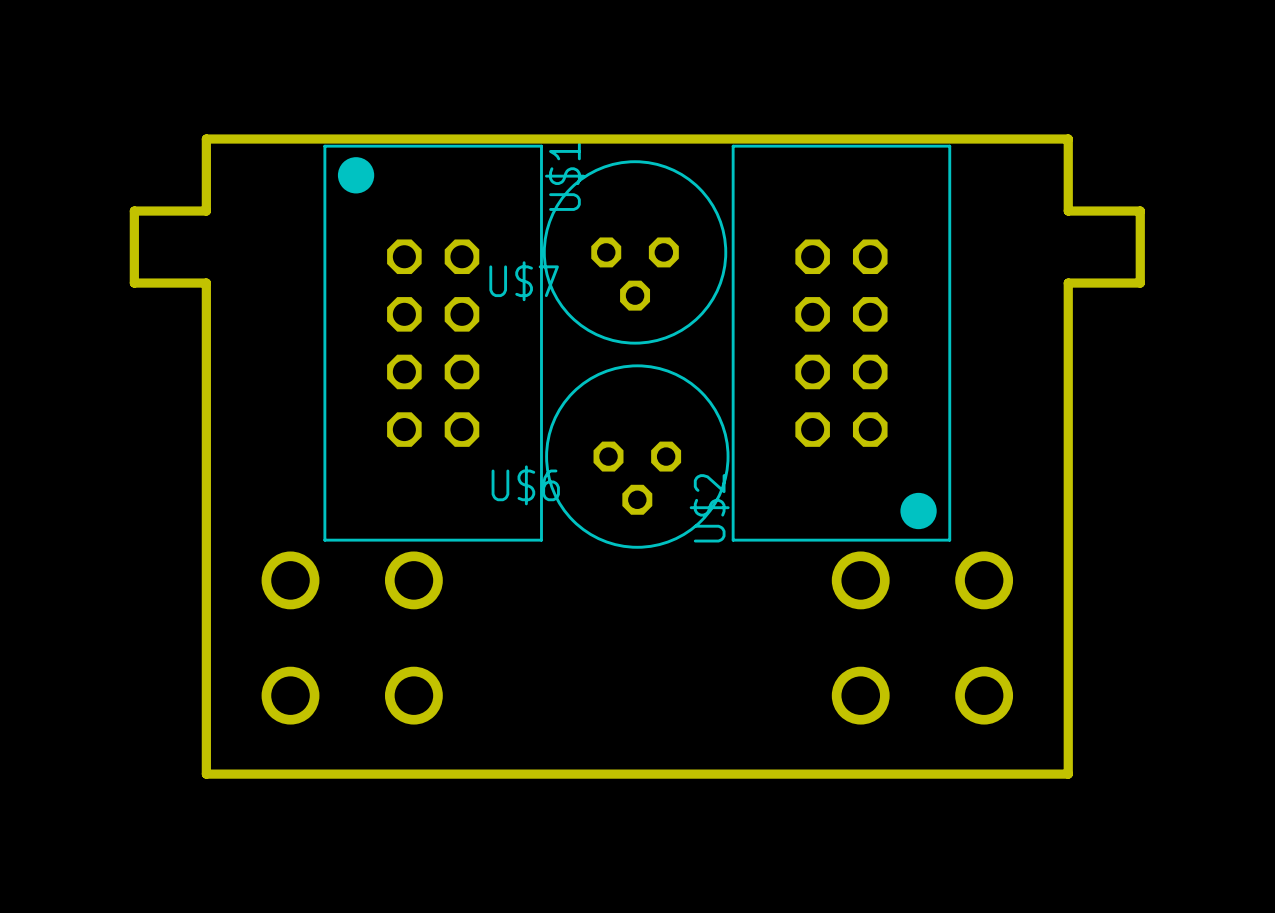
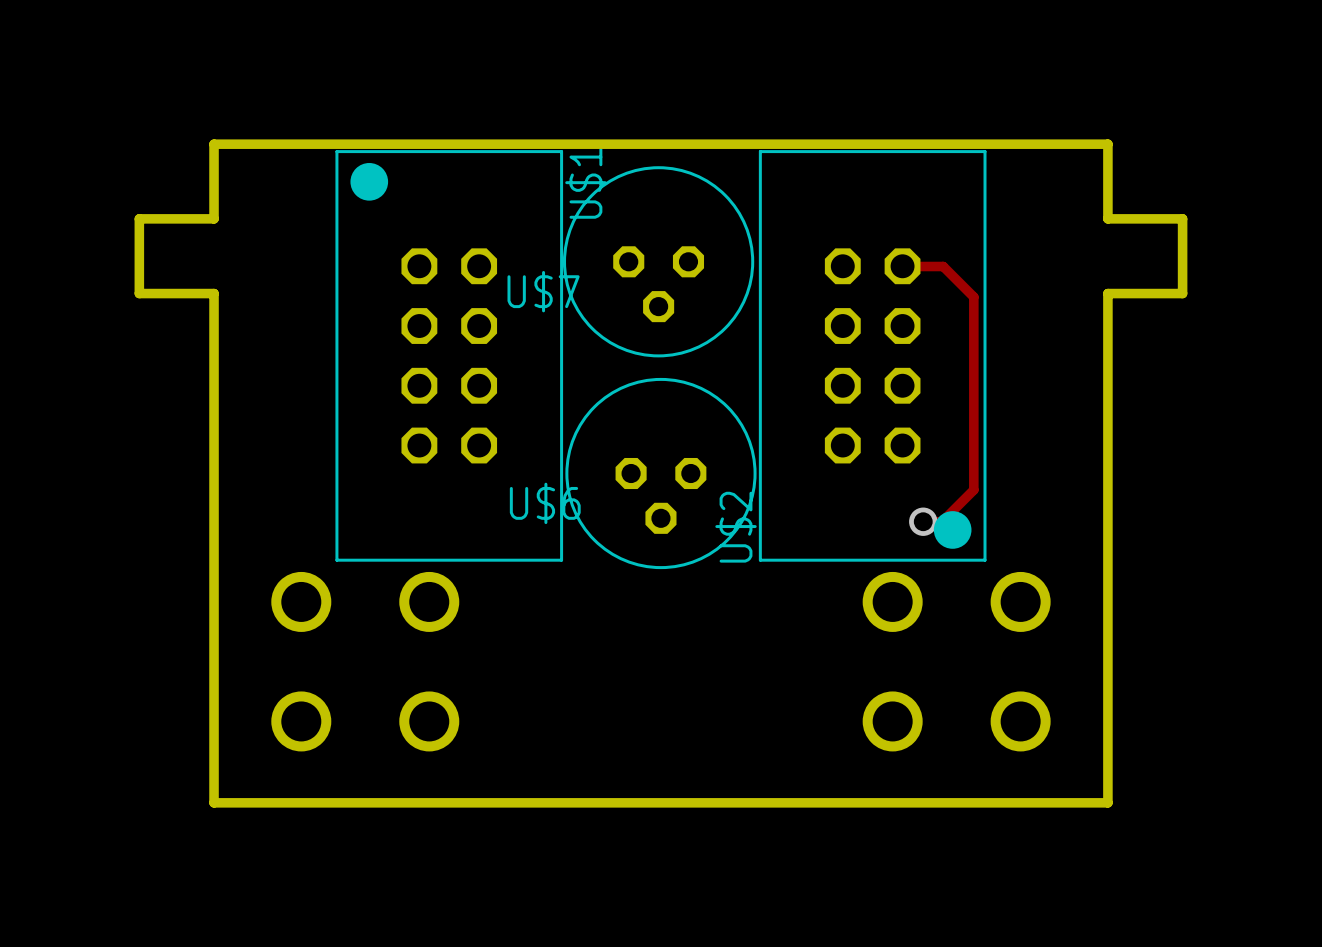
track: none -> (902, 266) (943, 266) (973, 297) (973, 489) (942, 521) (923, 521)
via: none -> (923, 521)

